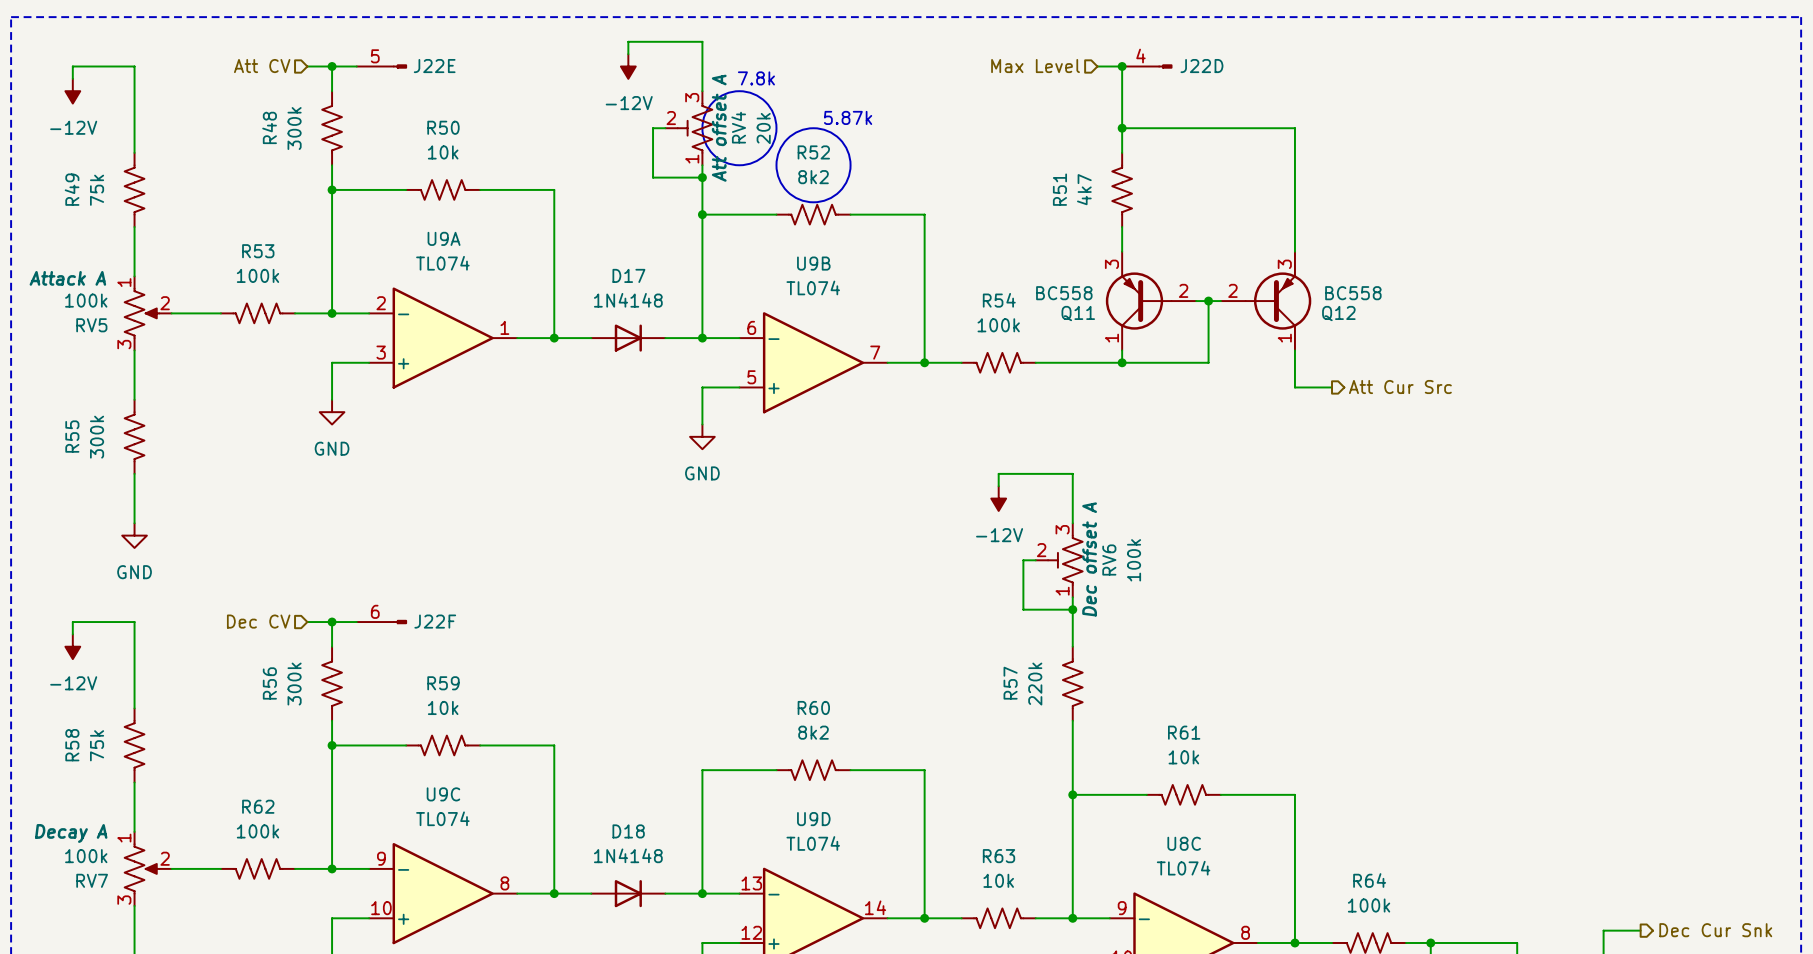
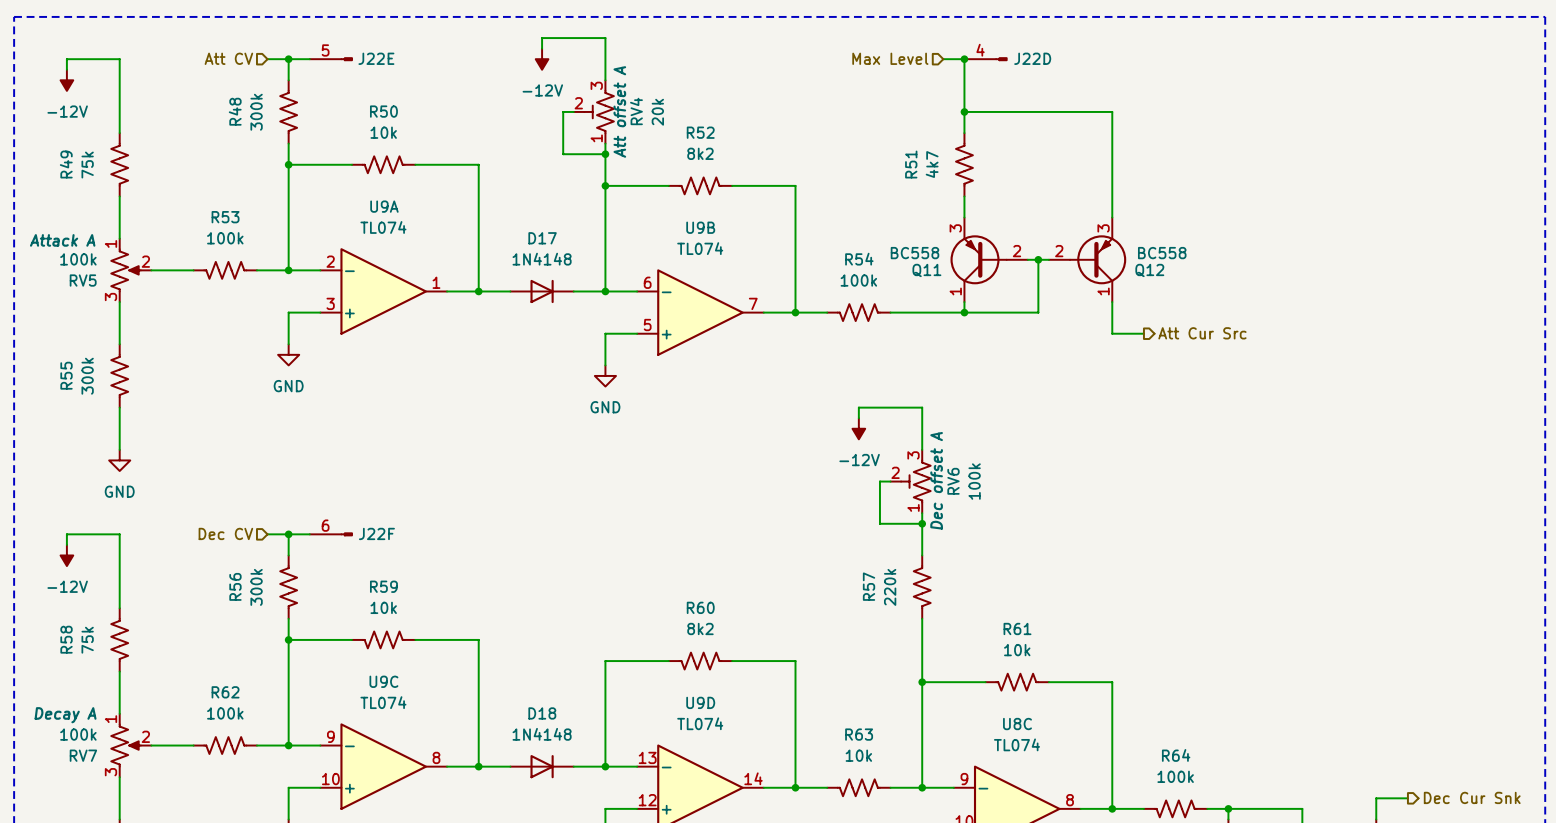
text: 7.8k (756, 78) -> none
drawing: [702, 91, 851, 203] -> none
text: 5.87k (848, 117) -> none

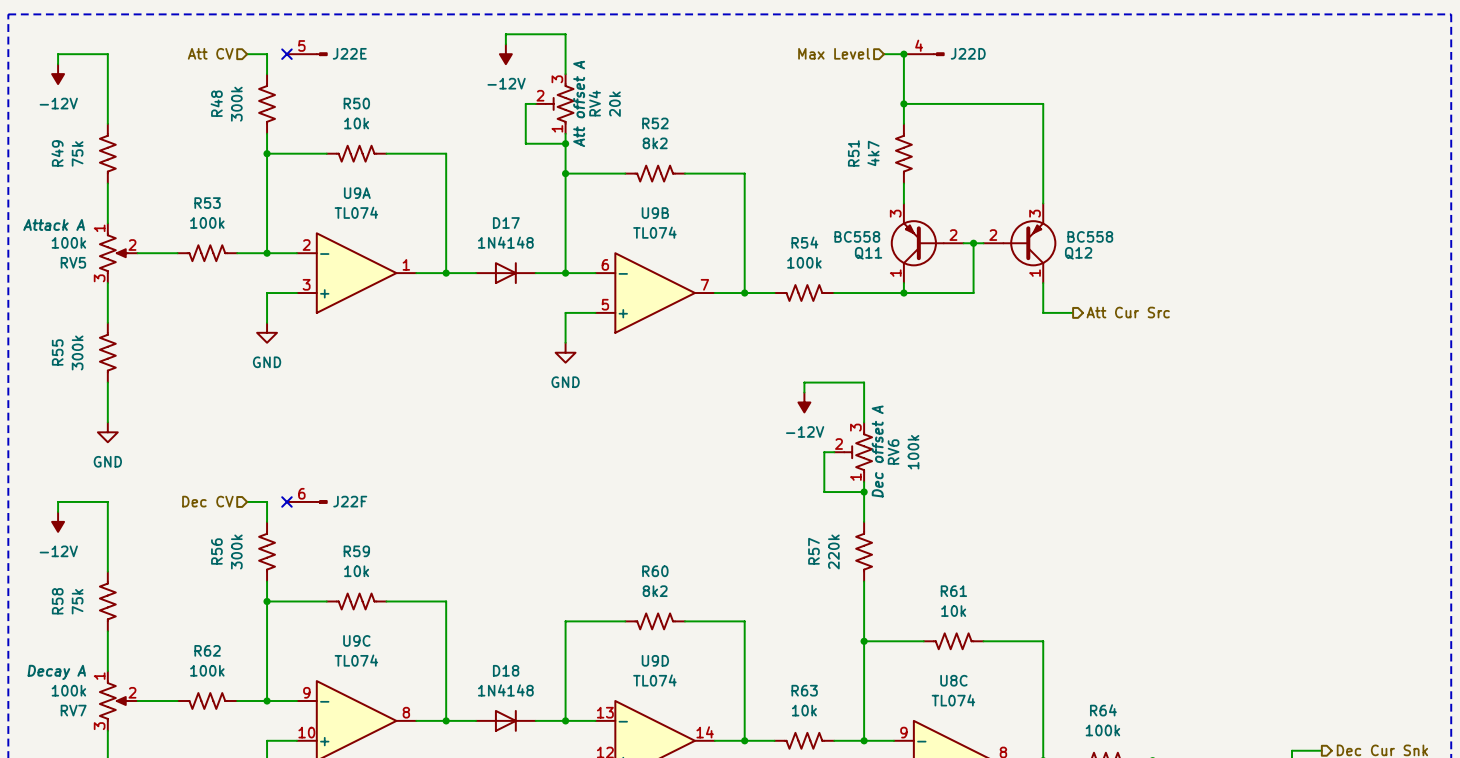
wire: (288, 59) (309, 59) -> none
junction: (288, 59) -> none
no-connect mark: none -> (286, 54)
wire: (288, 534) (309, 534) -> none
junction: (288, 534) -> none
no-connect mark: none -> (286, 501)

